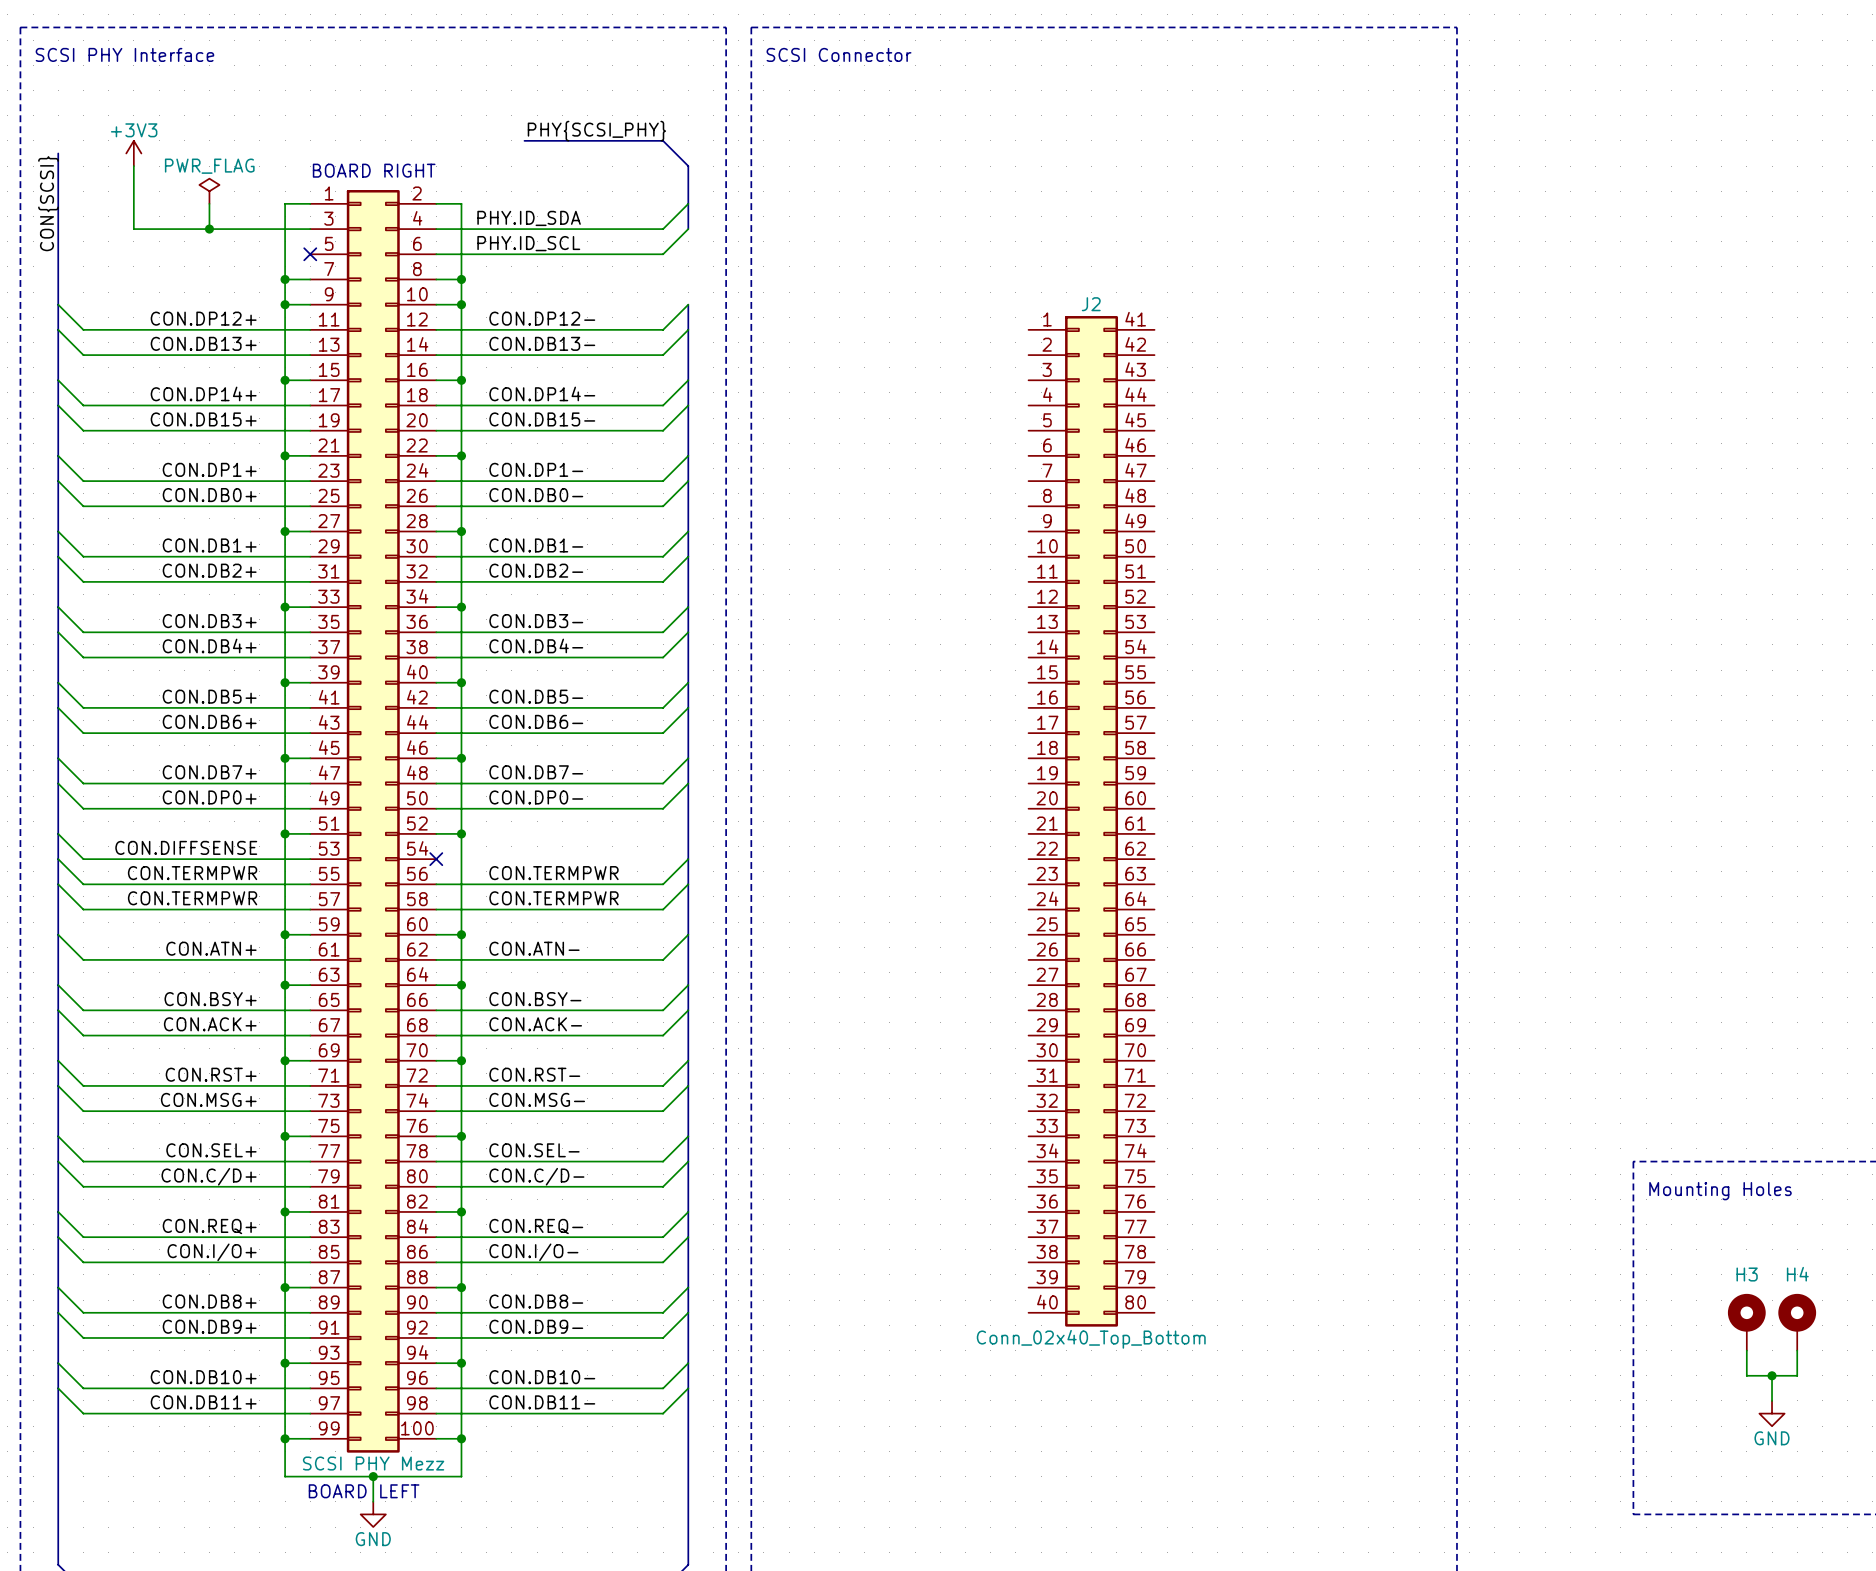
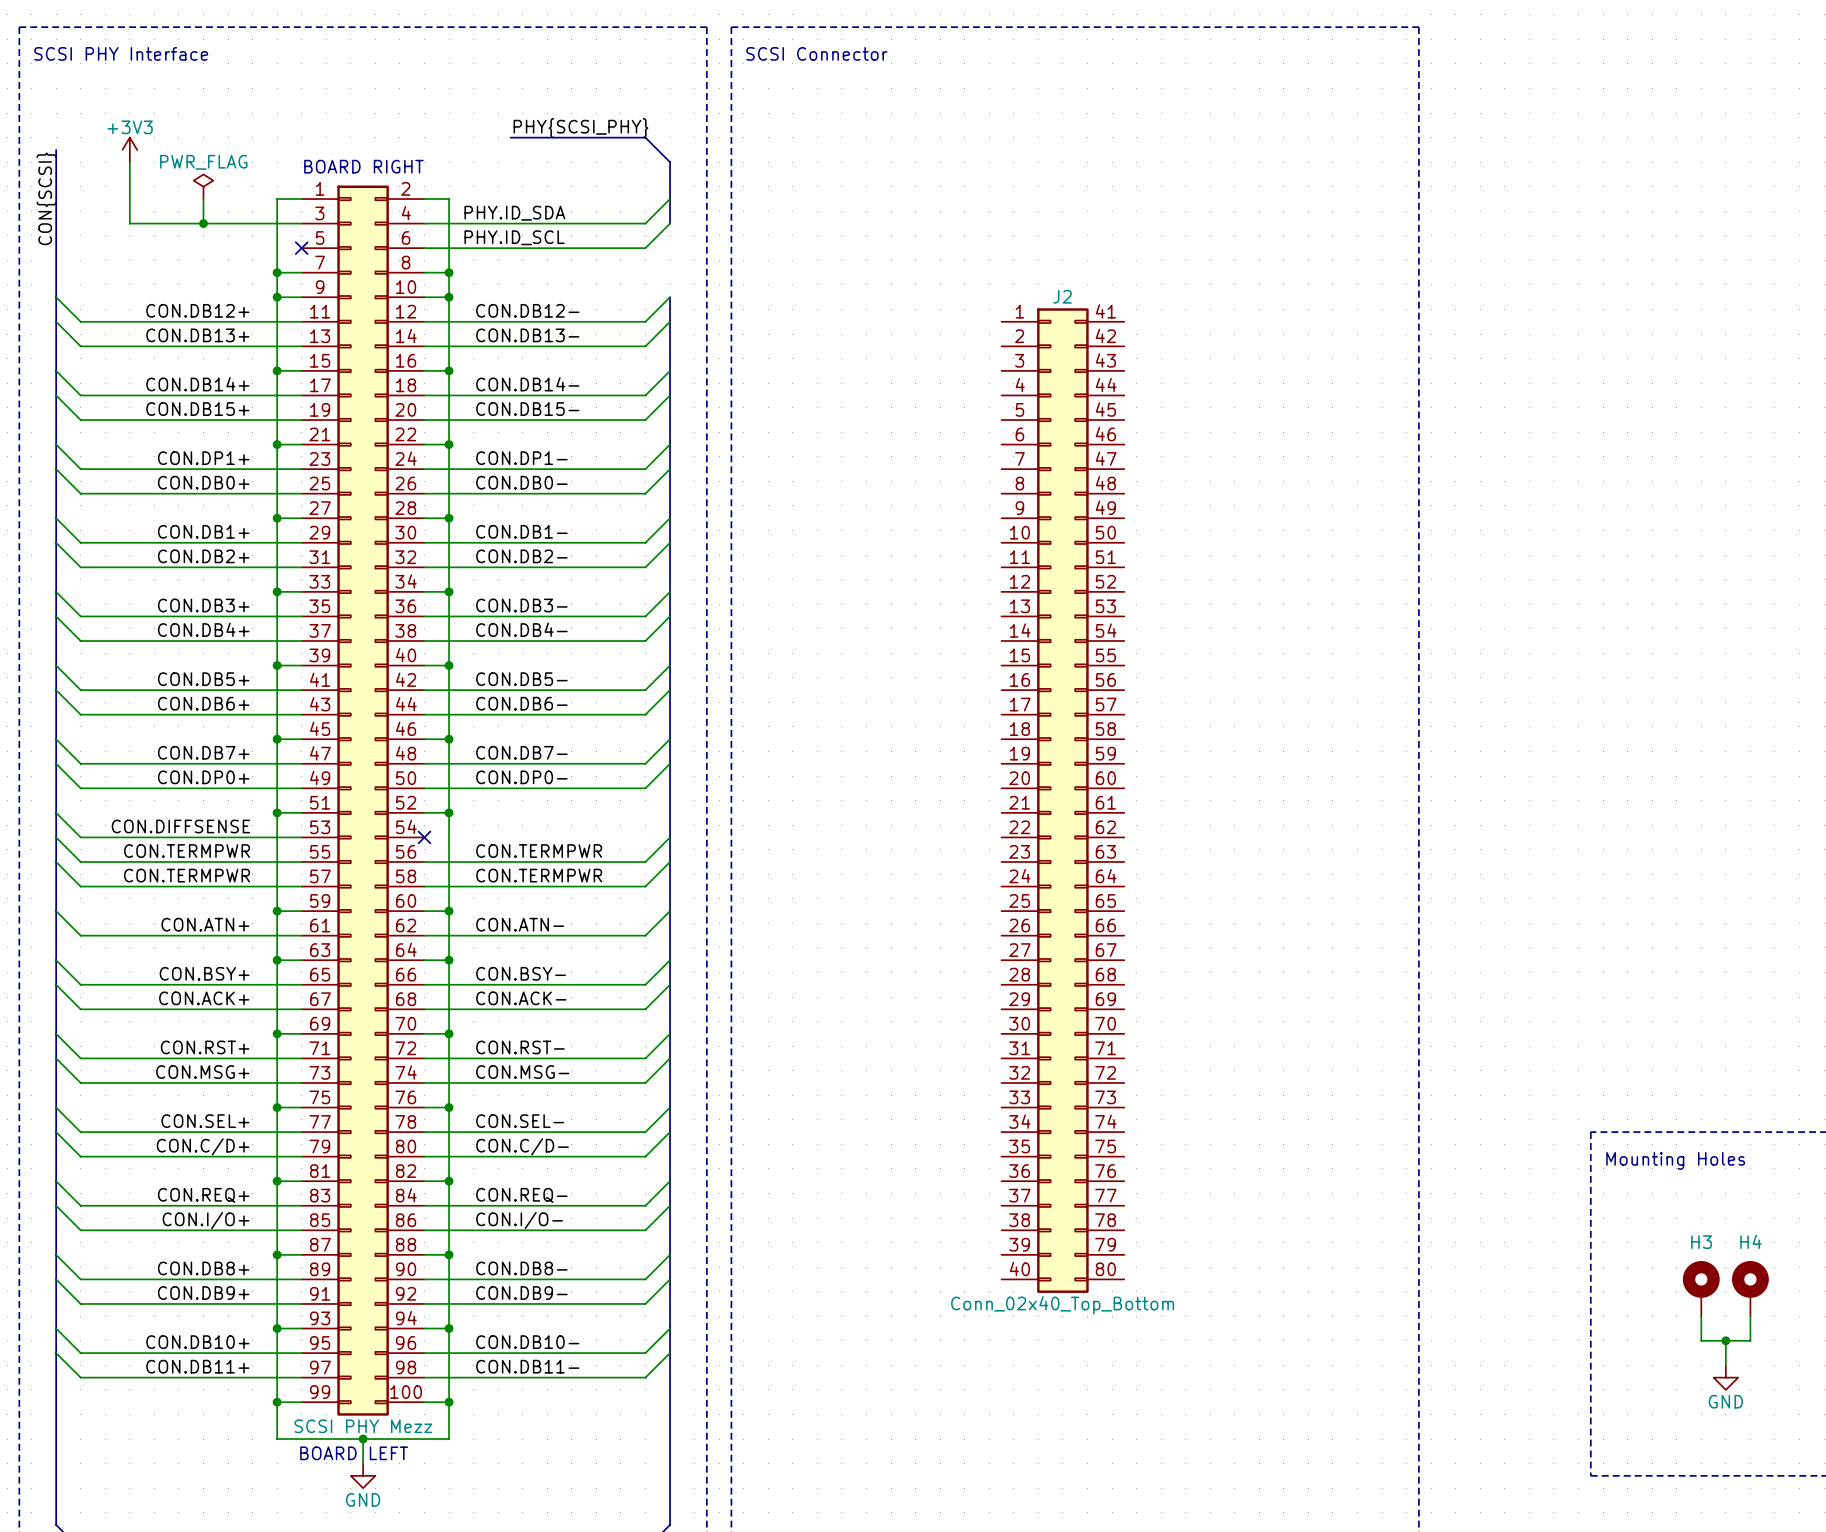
label: CON.DP12+ (203, 318) -> CON.DB12+ (197, 310)
label: CON.DP12- (542, 318) -> CON.DB12- (527, 310)
label: CON.DP14+ (203, 393) -> CON.DB14+ (197, 384)
label: CON.DP14- (542, 393) -> CON.DB14- (527, 384)

